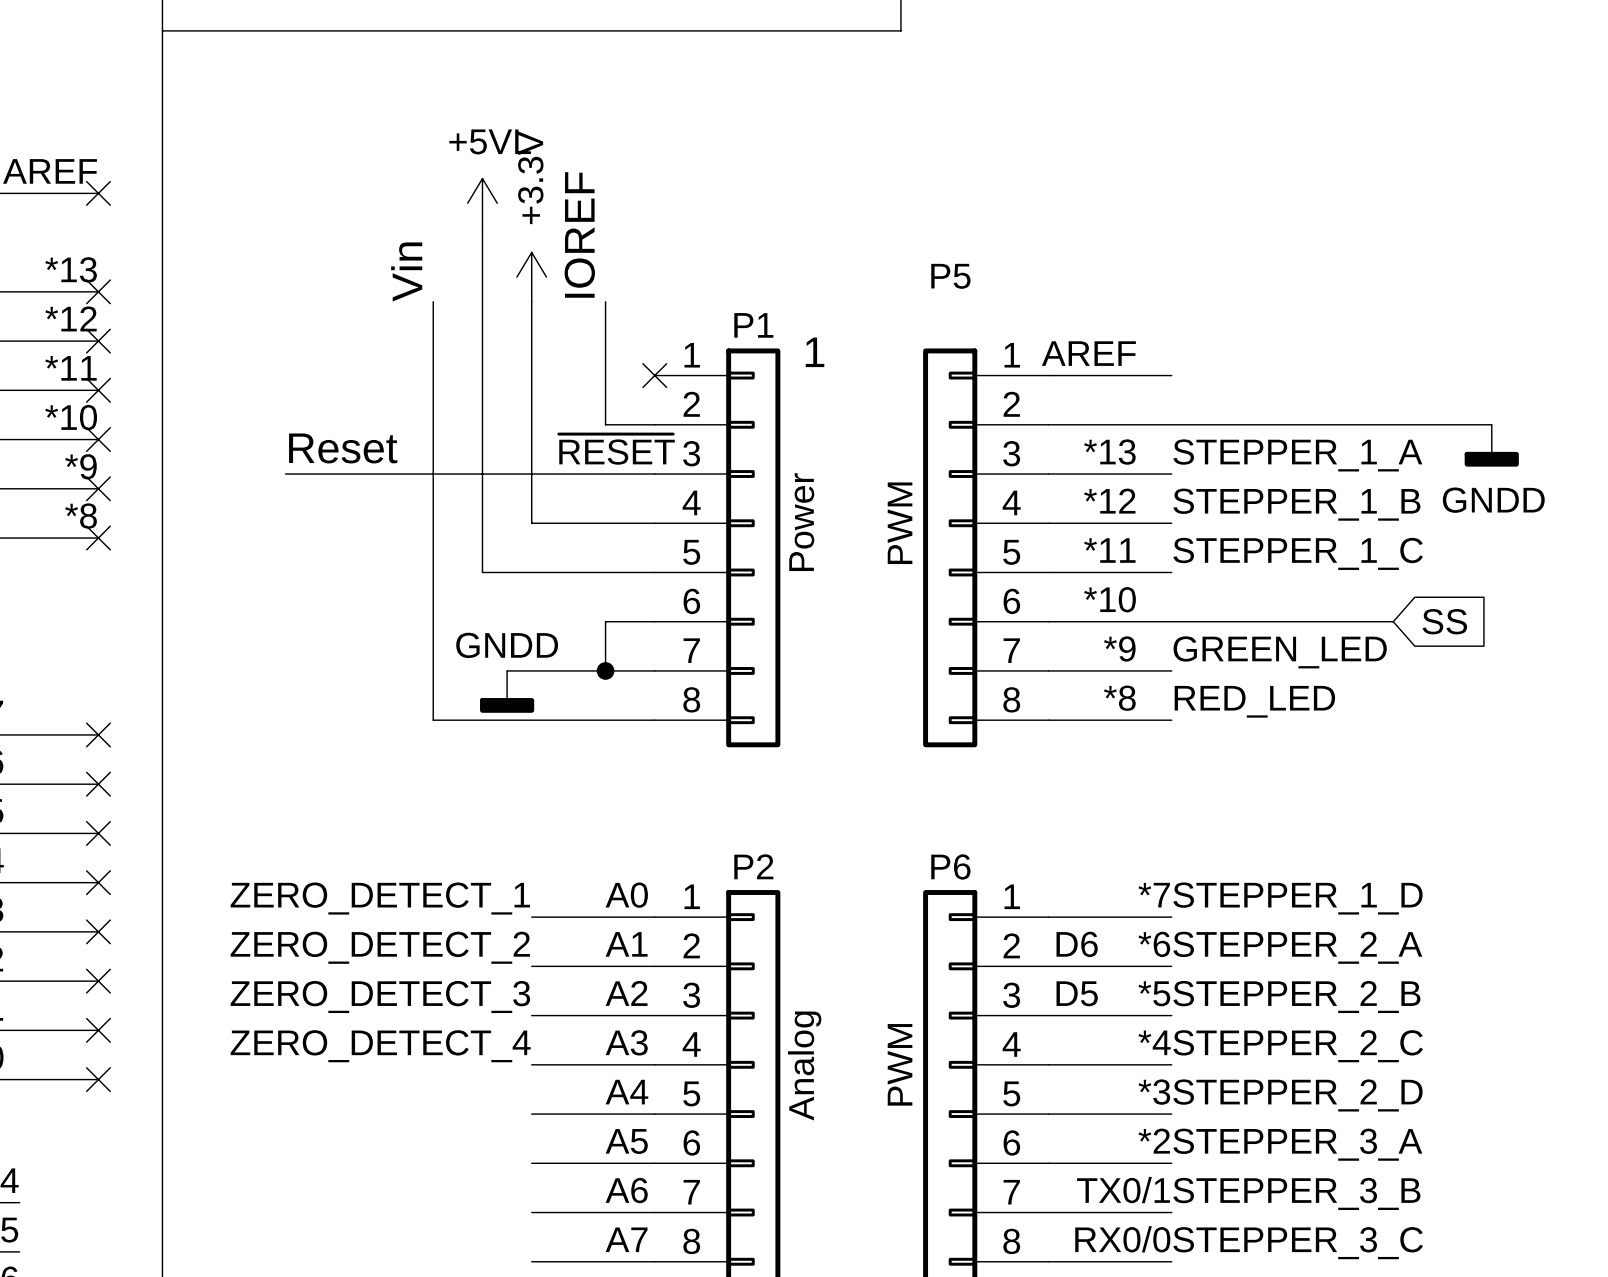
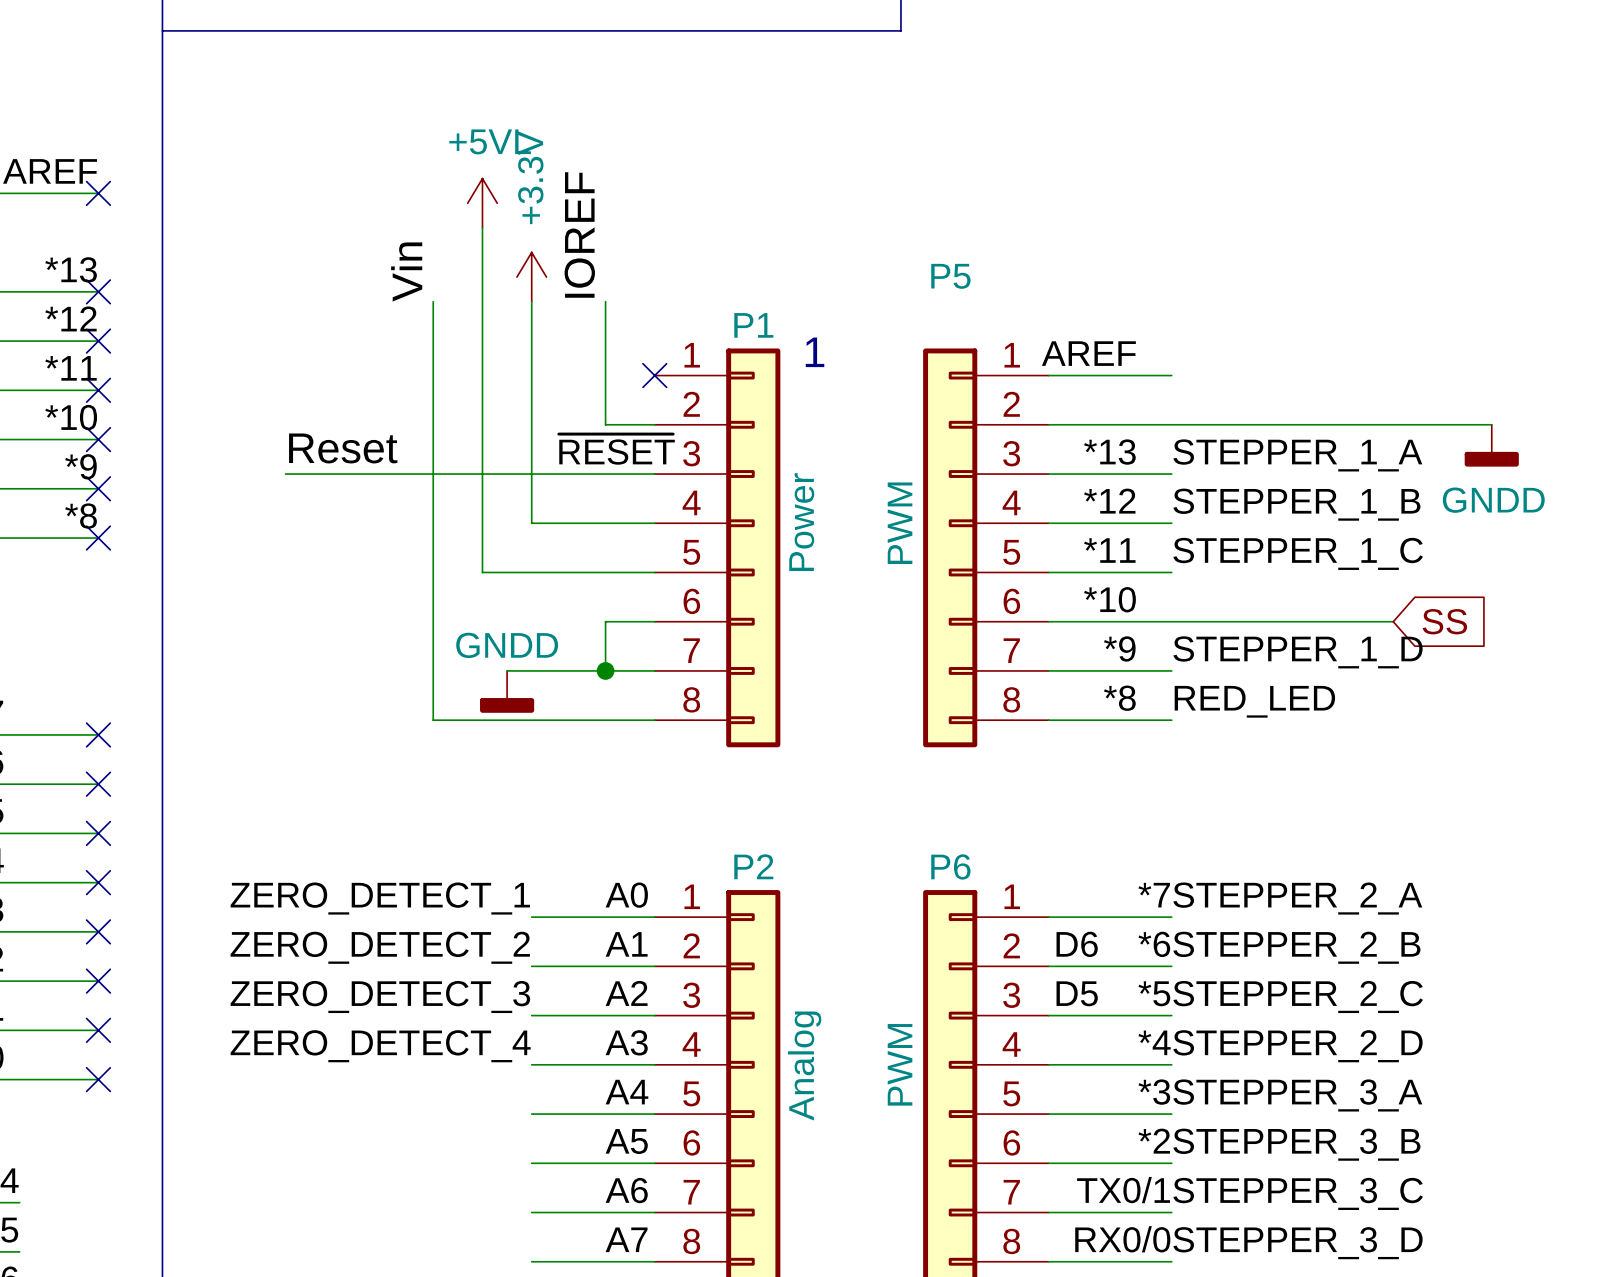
label: GREEN_LED (1280, 652) -> STEPPER_1_D (1297, 652)
label: STEPPER_1_D (1297, 898) -> STEPPER_2_A (1297, 898)
label: STEPPER_2_A (1297, 947) -> STEPPER_2_B (1296, 947)
label: STEPPER_2_B (1296, 996) -> STEPPER_2_C (1298, 996)
label: STEPPER_2_C (1298, 1046) -> STEPPER_2_D (1297, 1046)
label: STEPPER_2_D (1297, 1095) -> STEPPER_3_A (1297, 1095)
label: STEPPER_3_A (1297, 1144) -> STEPPER_3_B (1296, 1144)
label: STEPPER_3_B (1296, 1193) -> STEPPER_3_C (1298, 1193)
label: STEPPER_3_C (1298, 1243) -> STEPPER_3_D (1297, 1243)

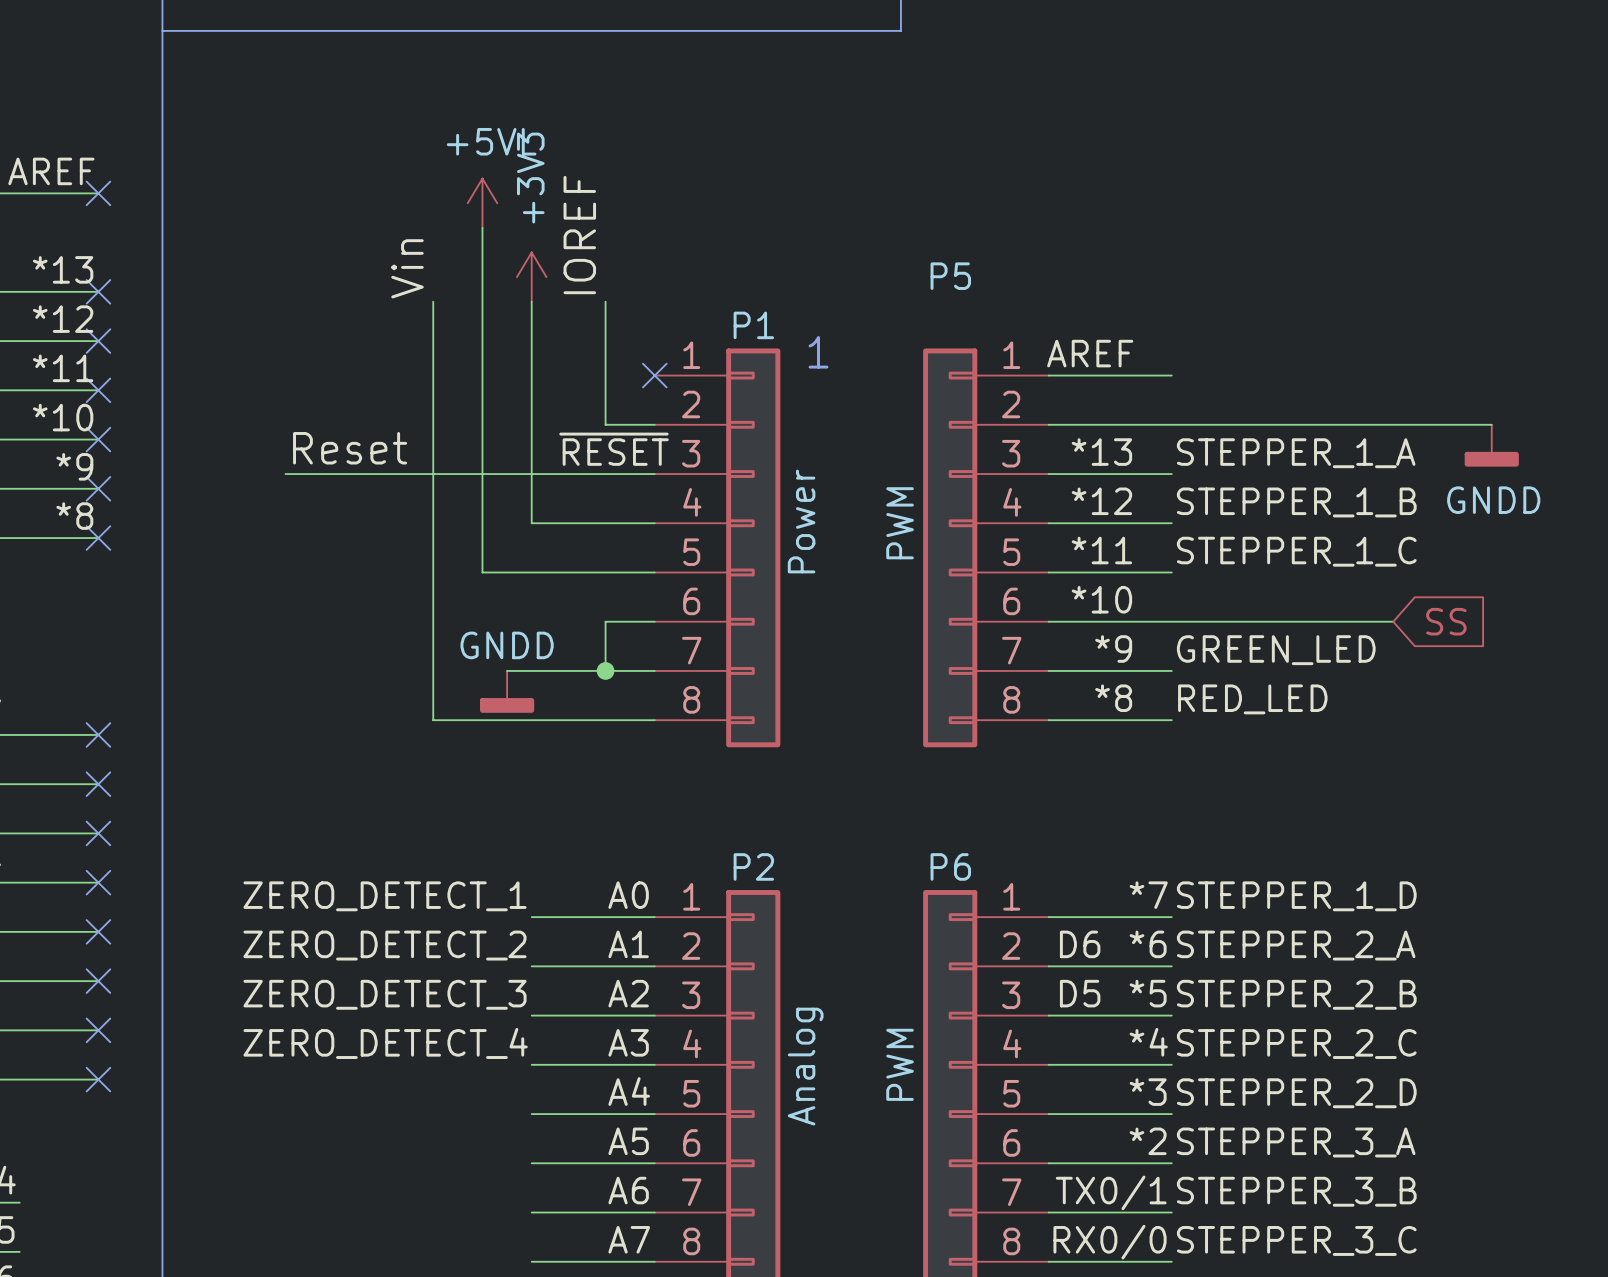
power symbol: +3.3V (531, 277) -> +3V3 (531, 277)
label: STEPPER_1_D (1297, 652) -> GREEN_LED (1276, 650)
label: STEPPER_2_A (1297, 898) -> STEPPER_1_D (1296, 896)
label: STEPPER_2_B (1296, 947) -> STEPPER_2_A (1296, 945)
label: STEPPER_2_C (1298, 996) -> STEPPER_2_B (1296, 994)
label: STEPPER_2_D (1297, 1046) -> STEPPER_2_C (1296, 1044)
label: STEPPER_3_A (1297, 1095) -> STEPPER_2_D (1296, 1093)
label: STEPPER_3_B (1296, 1144) -> STEPPER_3_A (1296, 1142)
label: STEPPER_3_C (1298, 1193) -> STEPPER_3_B (1296, 1191)
label: STEPPER_3_D (1297, 1243) -> STEPPER_3_C (1296, 1240)

